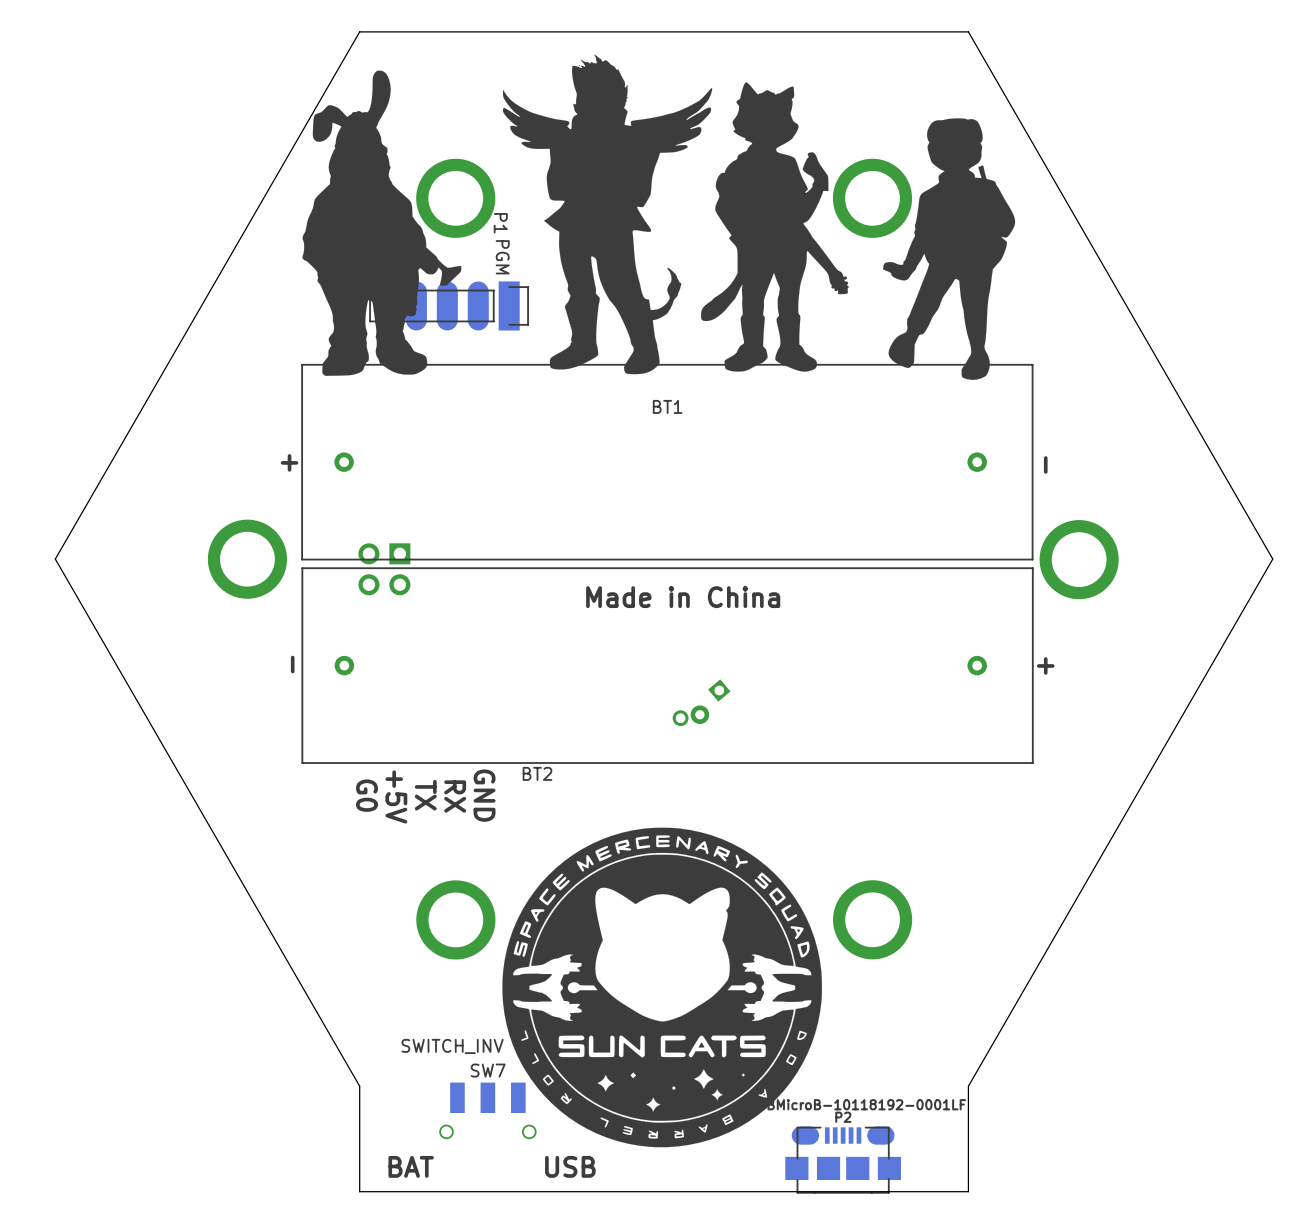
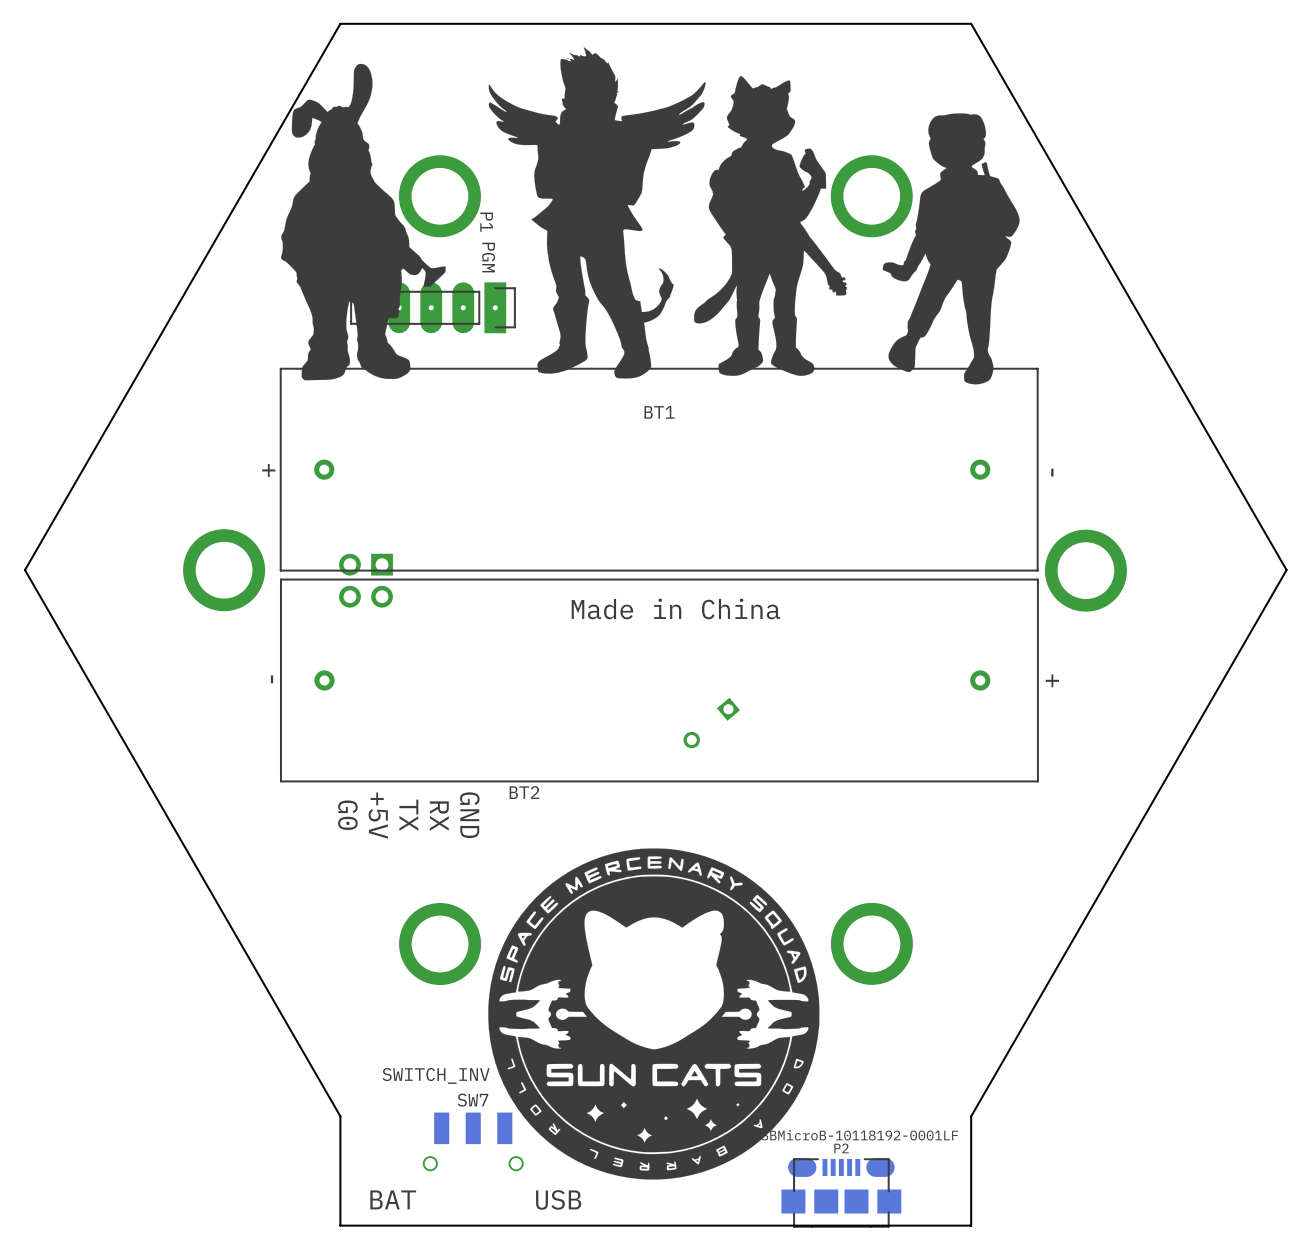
P1 footprint: [369, 281, 529, 331] -> [350, 282, 516, 334]
part: (701, 702) -> none
part: none -> (711, 722)

